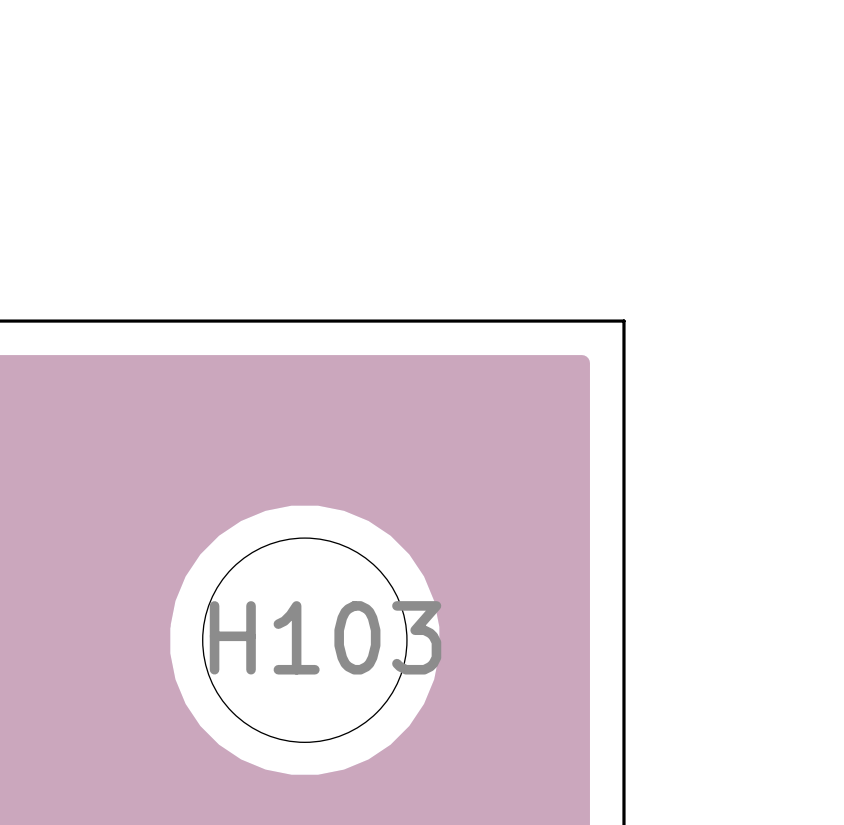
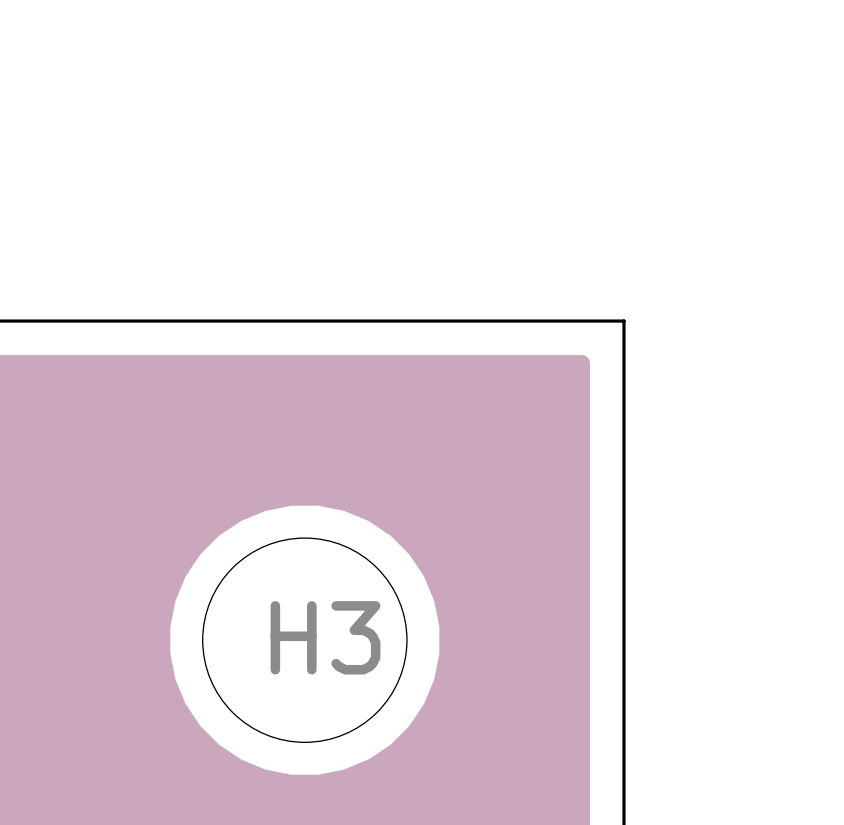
H103 name: H103 (325, 637) -> H3 (325, 637)

